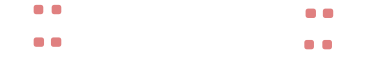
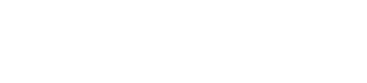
part: (47, 9) -> none
part: (319, 13) -> none
part: (47, 42) -> none
part: (318, 44) -> none

